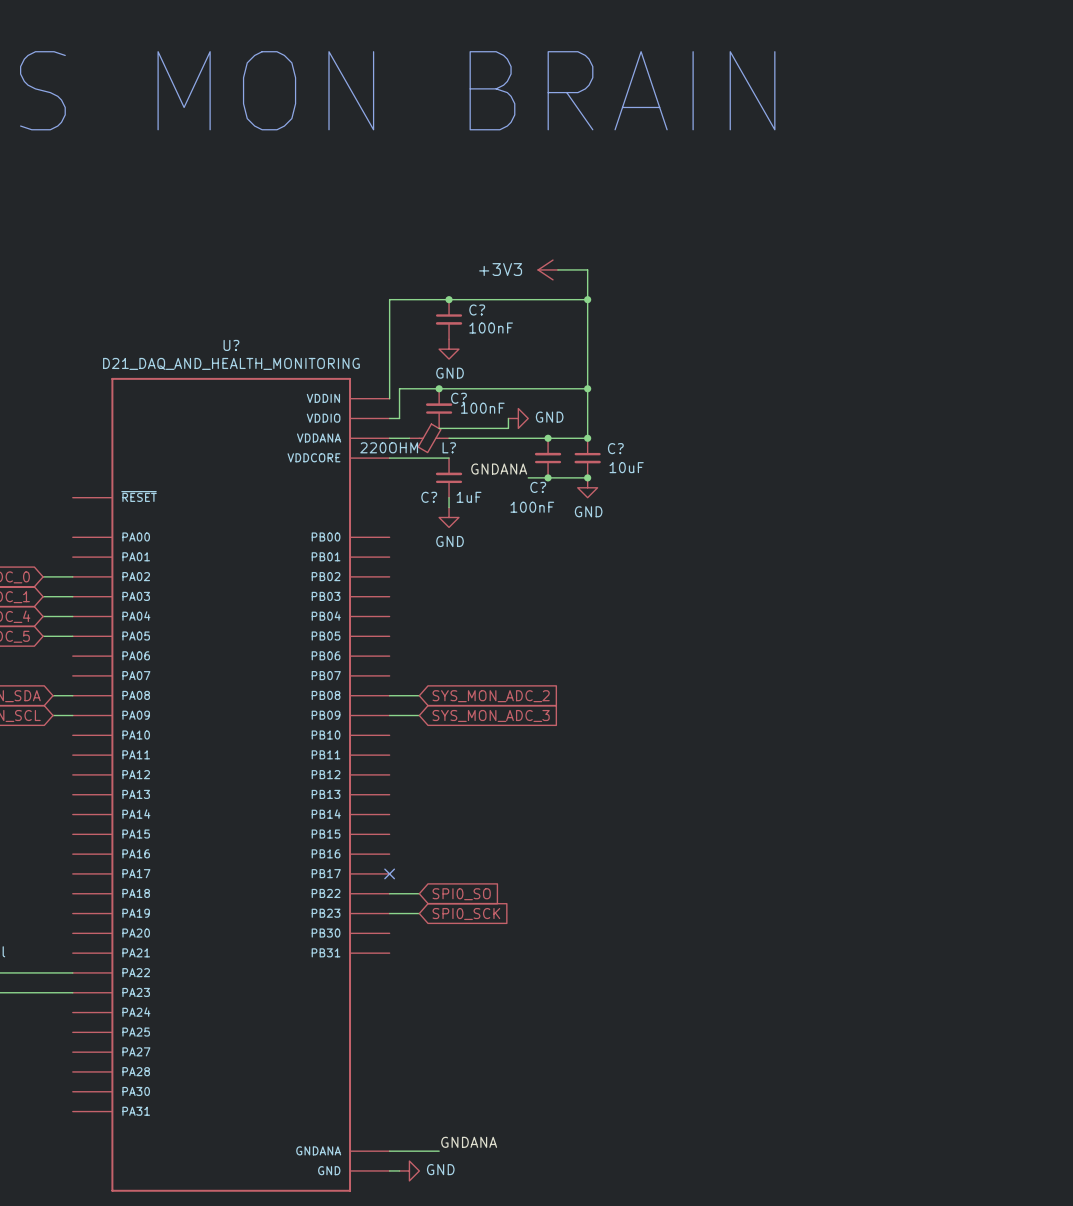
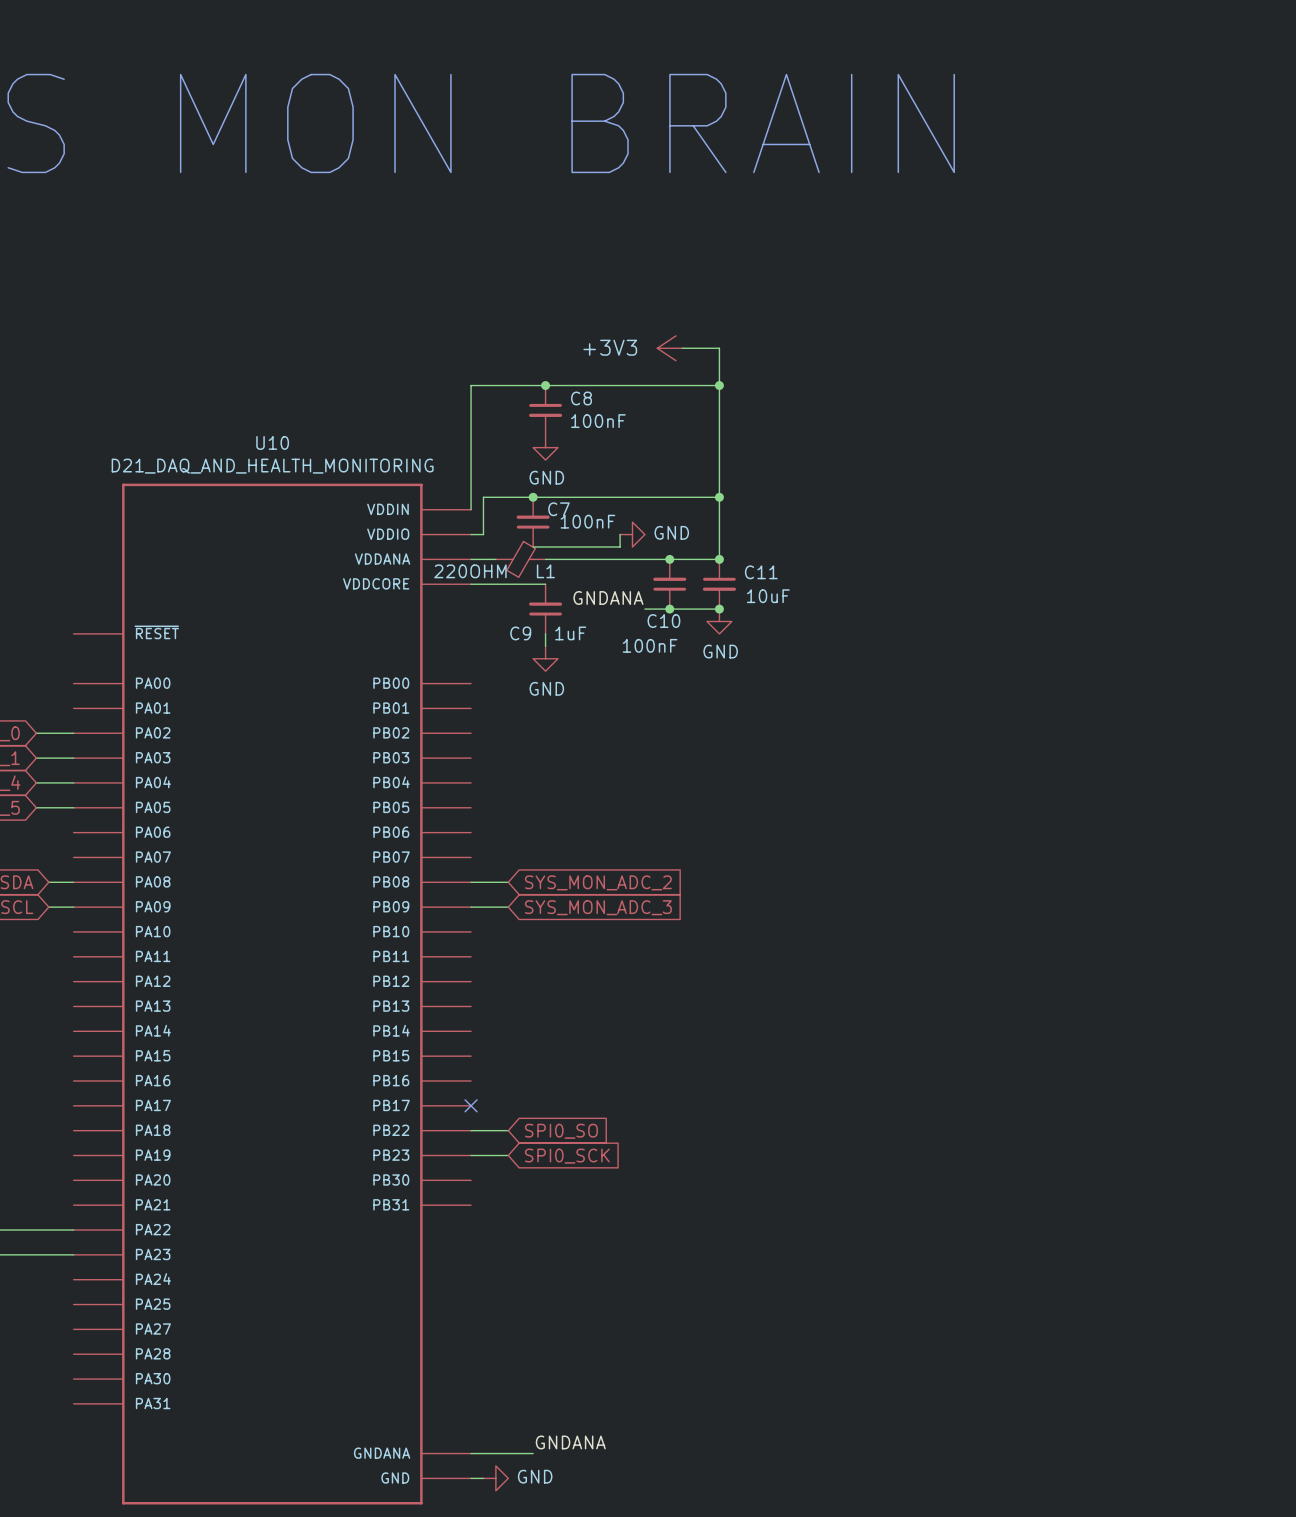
C? name: C? (477, 309) -> C8 (581, 398)
U? name: U? (231, 345) -> U10 (272, 442)
C? name: C? (459, 398) -> C7 (558, 509)
L? name: L? (449, 447) -> L1 (545, 571)
C? name: C? (615, 448) -> C11 (761, 572)
C? name: C? (538, 487) -> C10 (663, 621)
C? name: C? (429, 497) -> C9 (520, 633)

